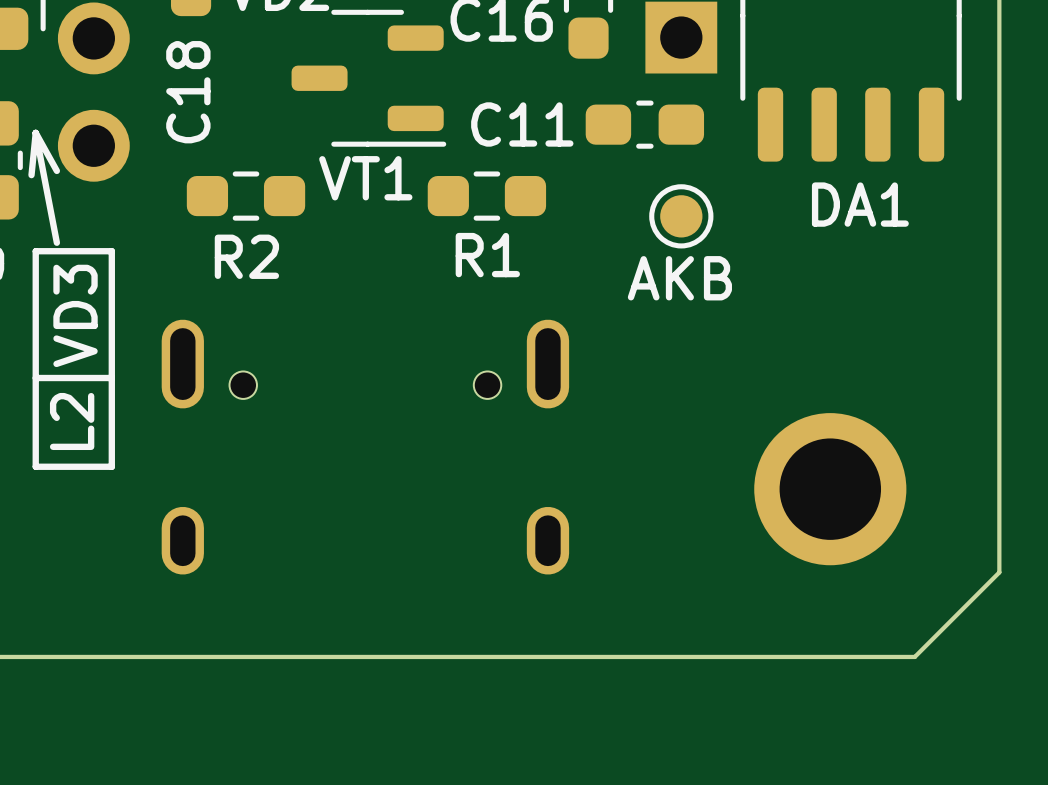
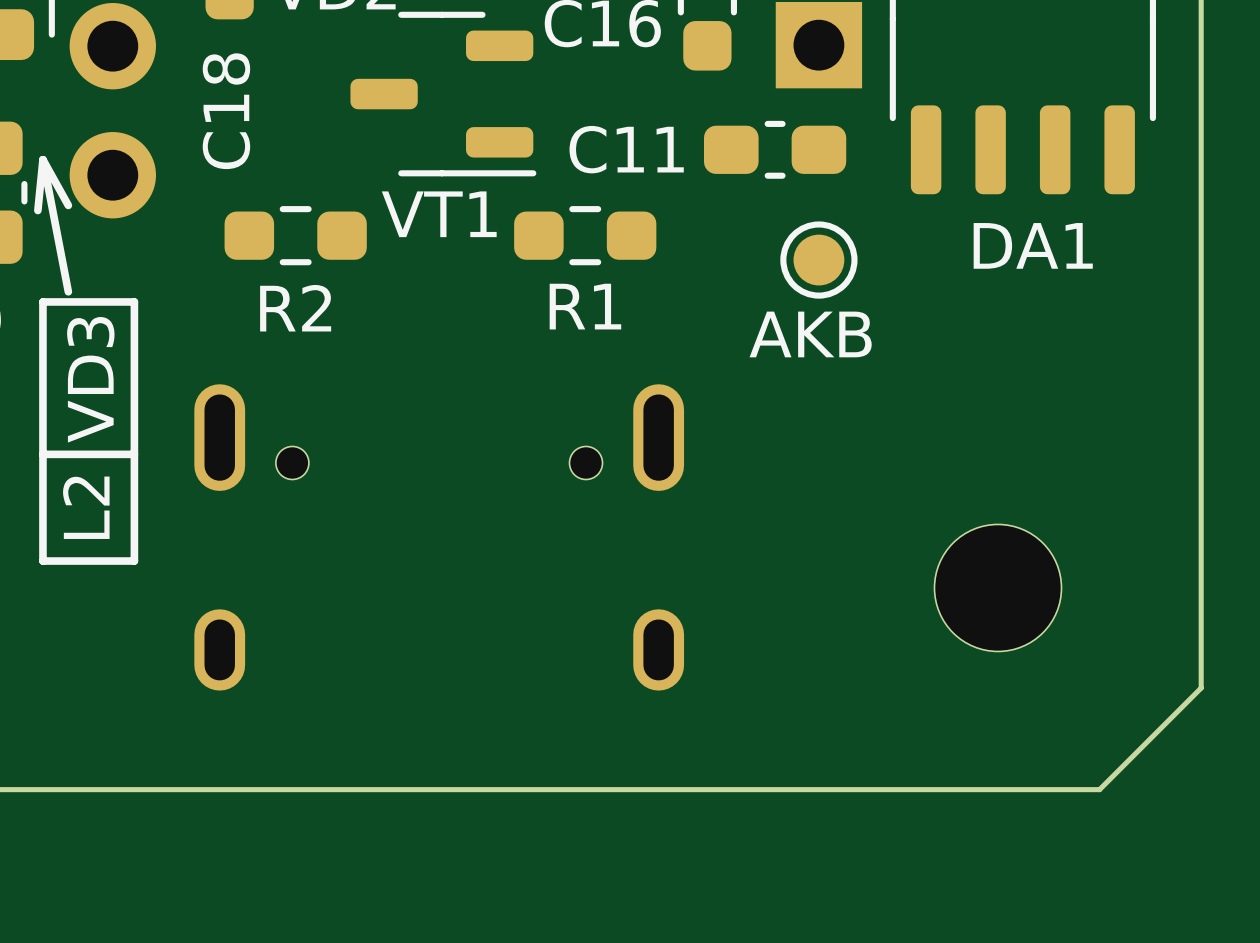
part footprint: [754, 413, 907, 566] -> [934, 524, 1062, 652]

